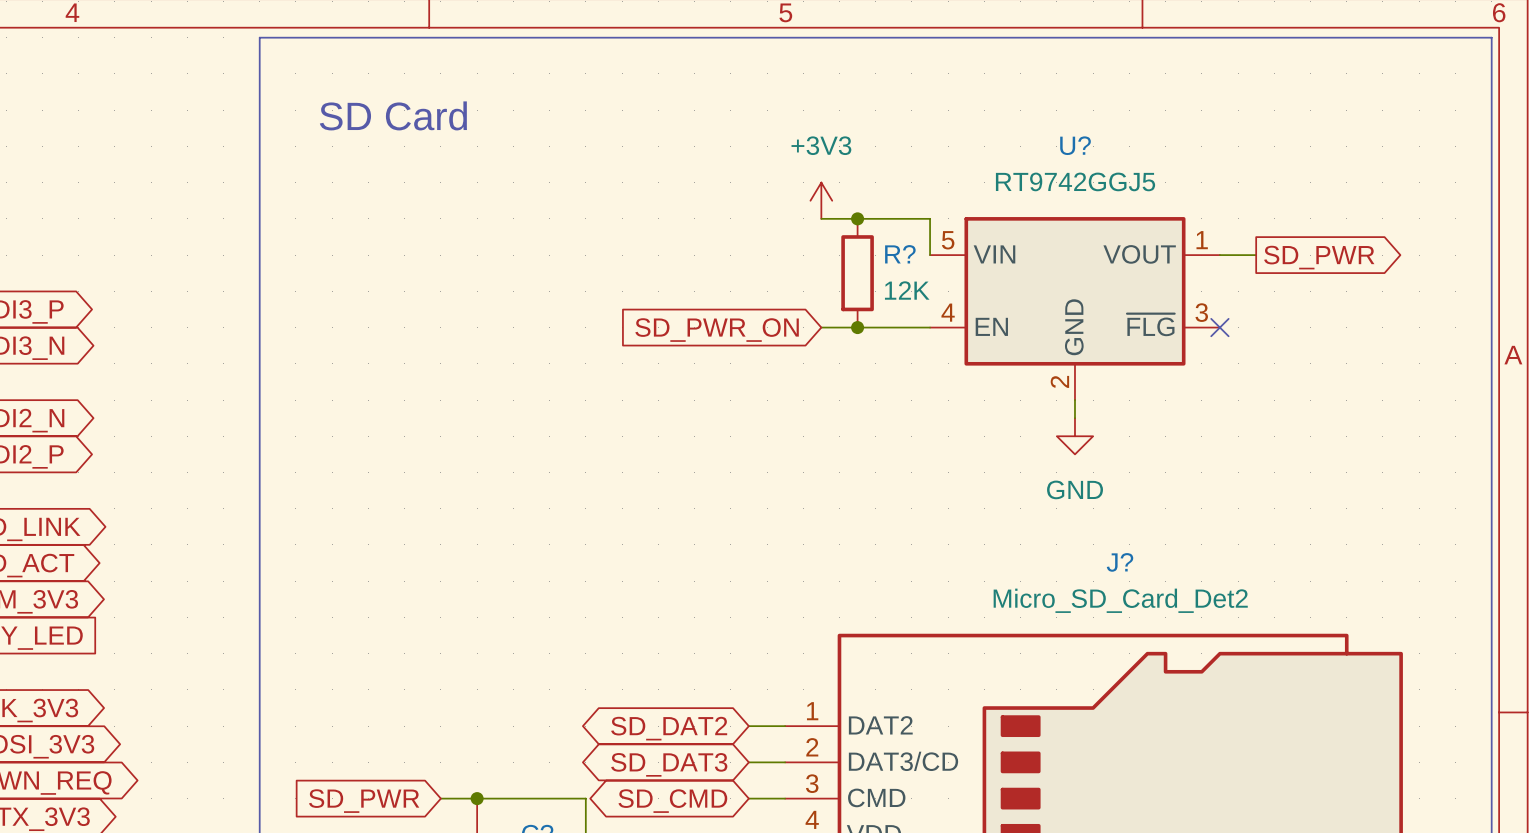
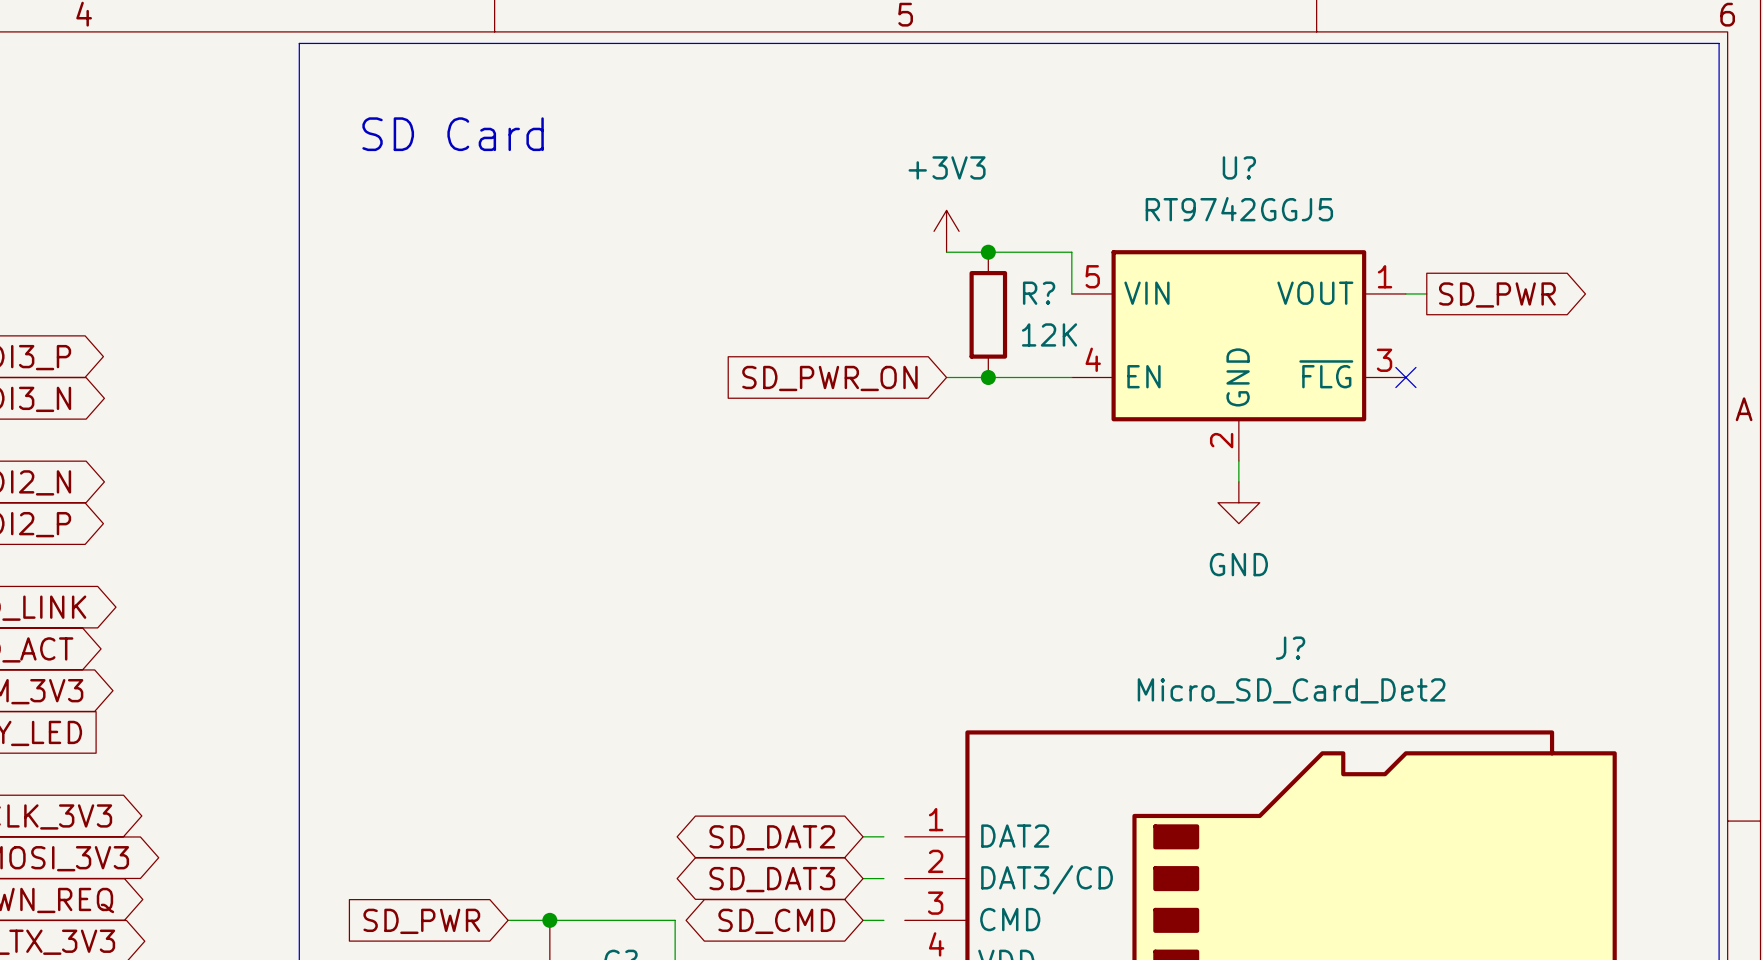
wire: (1238, 255) (1256, 255) -> none
global label position: SD_PWR (1319, 257) -> SD_PWR (1497, 294)
wire: (767, 726) (785, 726) -> none
wire: (767, 762) (785, 762) -> none
wire: (767, 798) (785, 798) -> none

